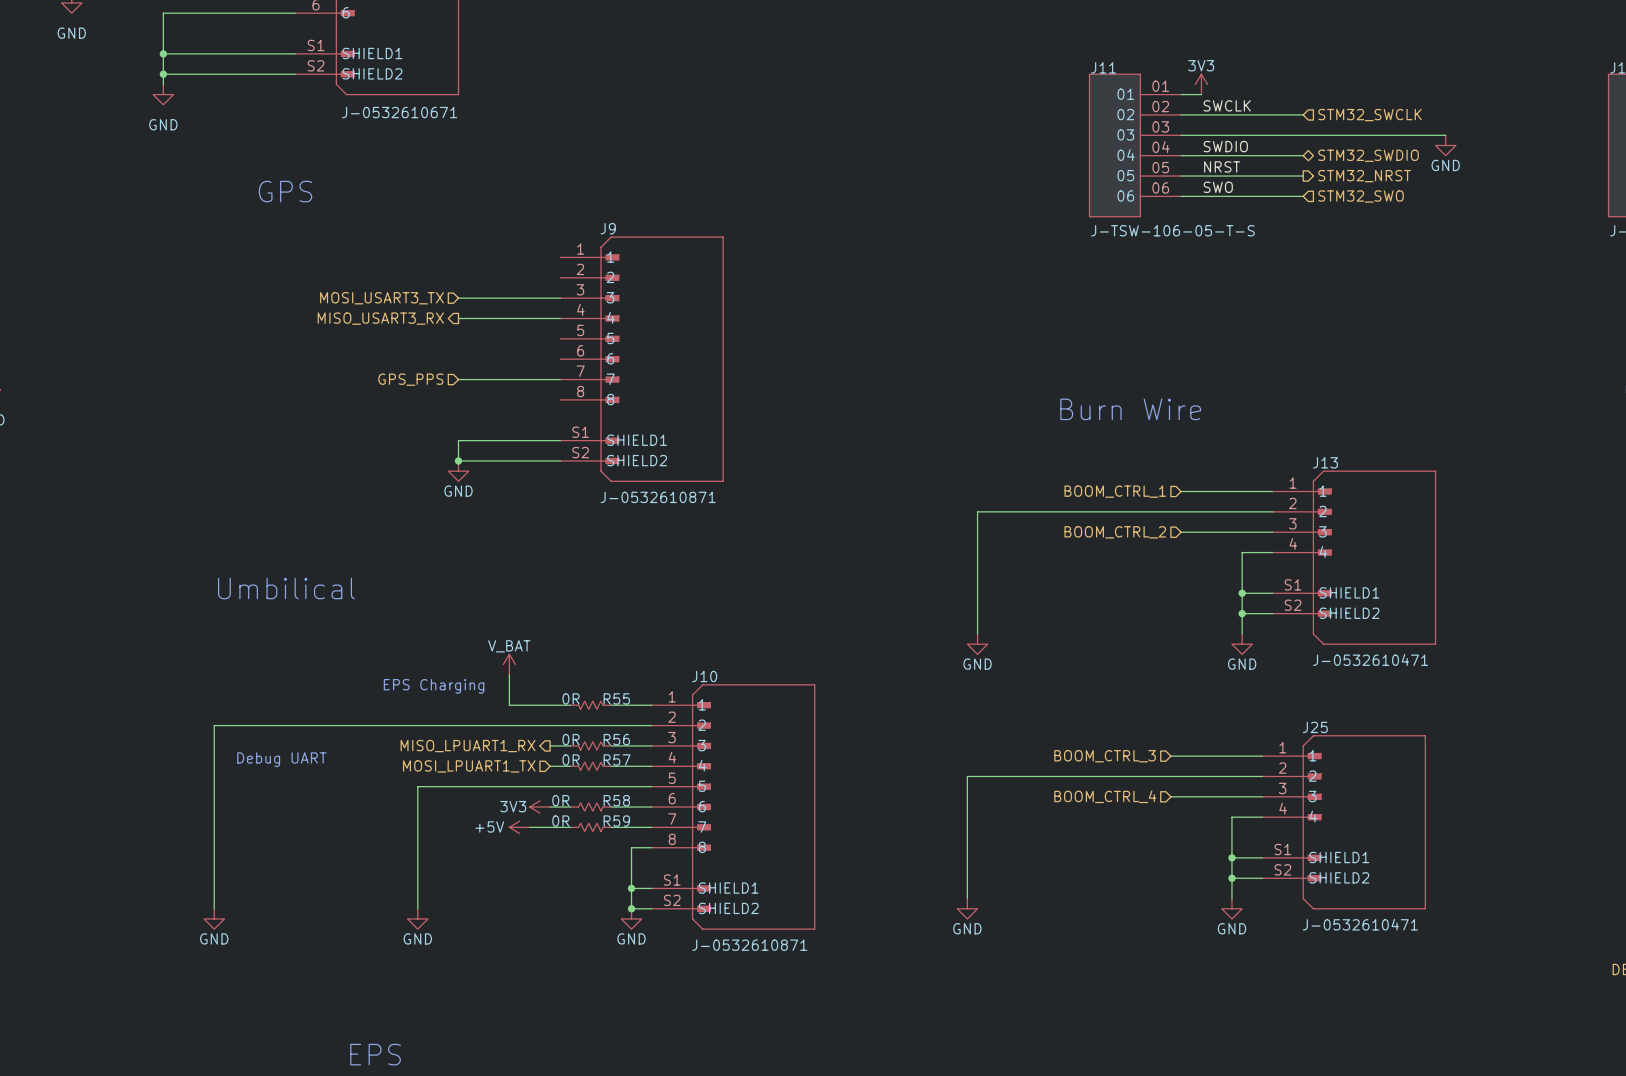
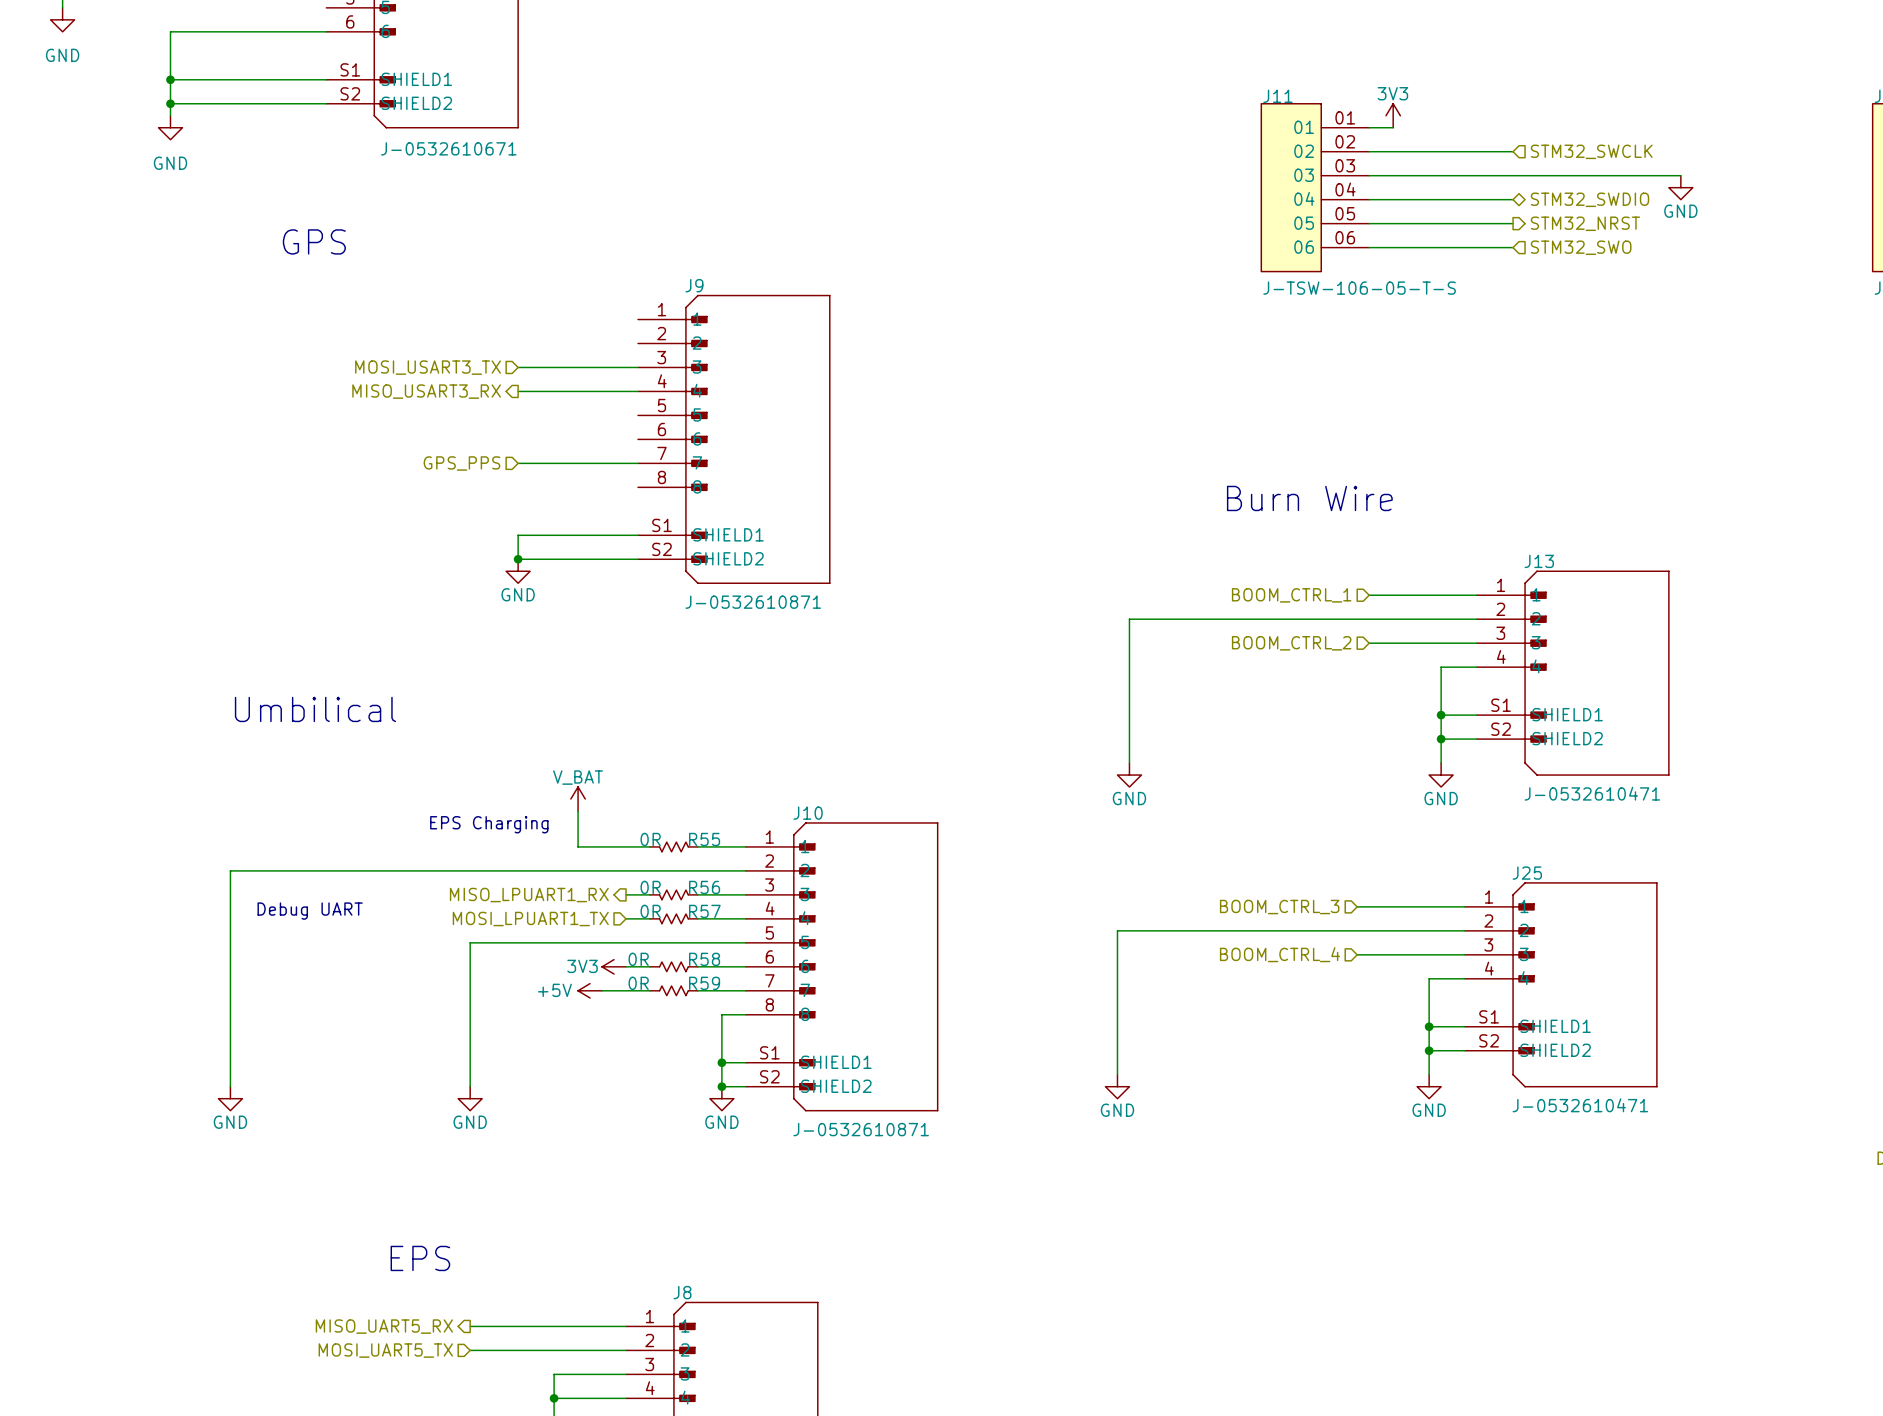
label: SWCLK (1227, 105) -> none
label: SWDIO (1225, 146) -> none
label: NRST (1222, 166) -> none
label: SWO (1218, 187) -> none

